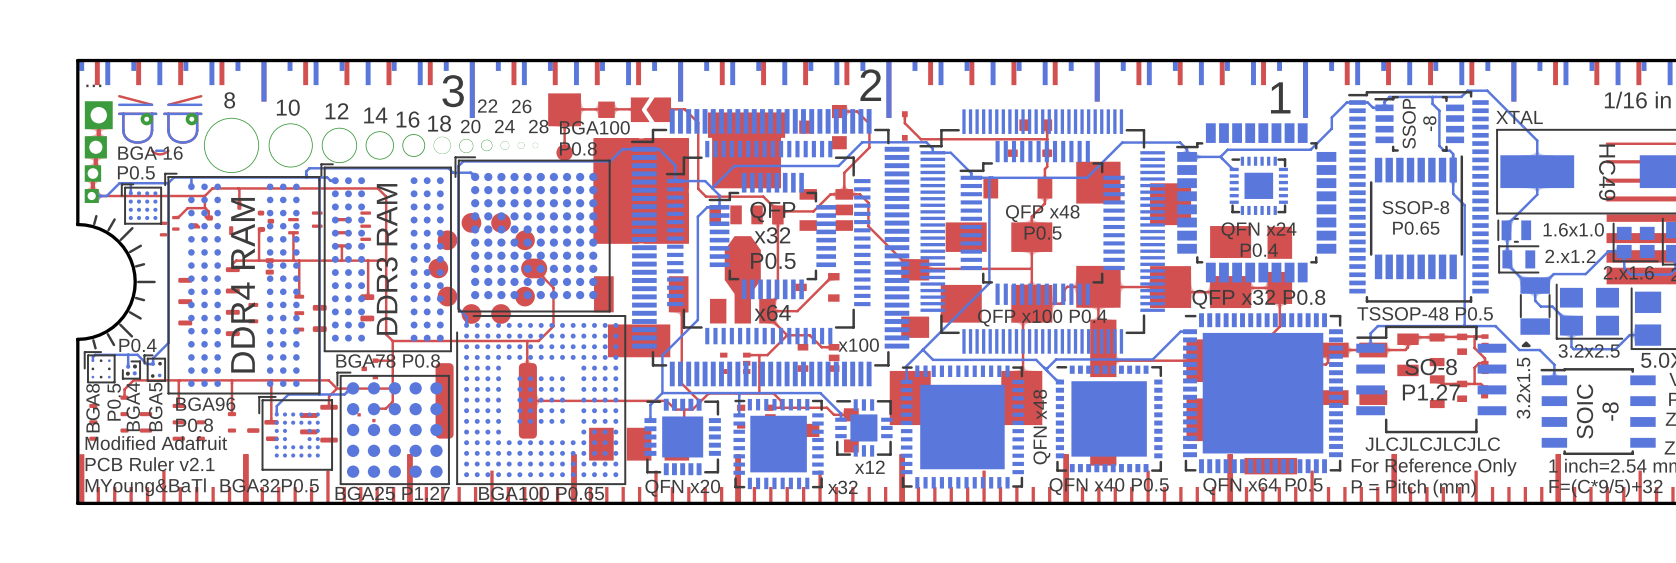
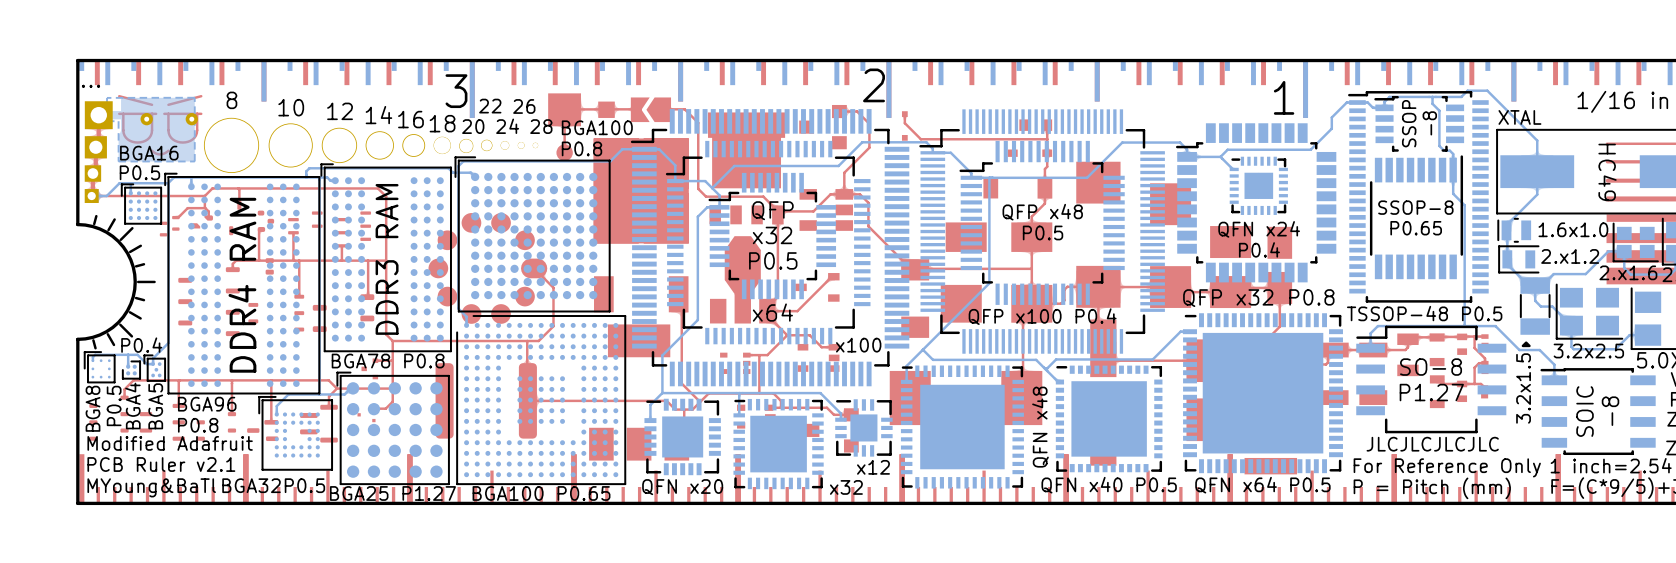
part footprint: [118, 94, 203, 156] -> [118, 94, 203, 156]
bottom zone outline: none -> (194, 97) (107, 97) (107, 121) (118, 121) (118, 161) (194, 161) (194, 97)
text: BGA 16 (150, 153) -> BGA16 (149, 153)
part footprint: [83, 351, 116, 384] -> [83, 351, 116, 384]
part footprint: [143, 354, 167, 382] -> [143, 354, 167, 382]
part footprint: [121, 360, 142, 380] -> [121, 360, 142, 380]

